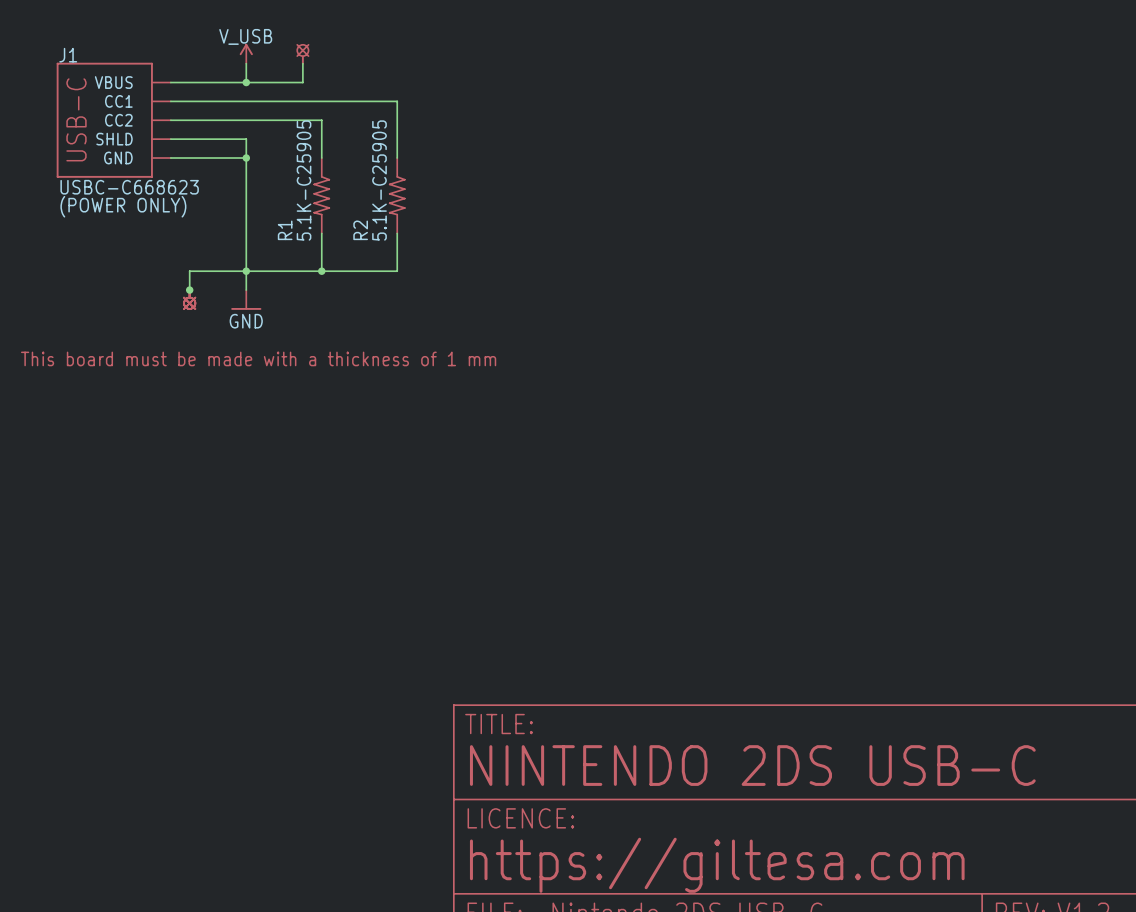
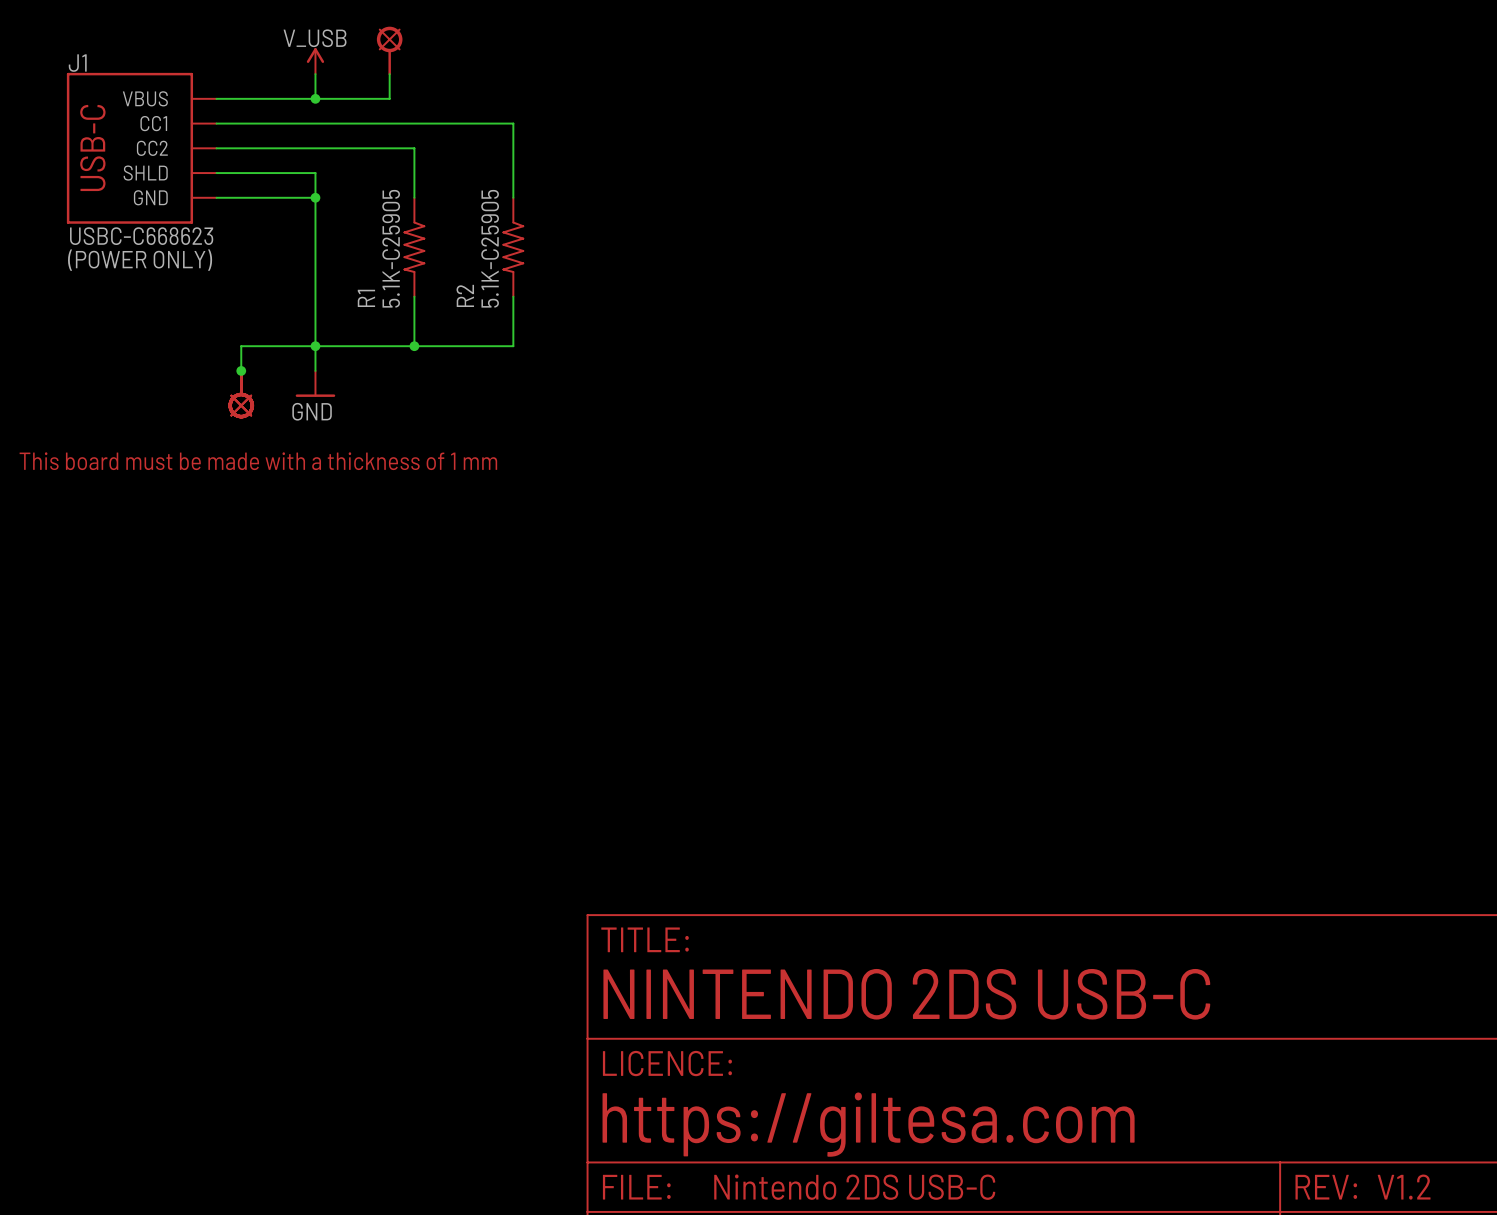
part: none -> (389, 51)
part: (302, 54) -> none
part: (189, 299) -> none
part: none -> (241, 394)

